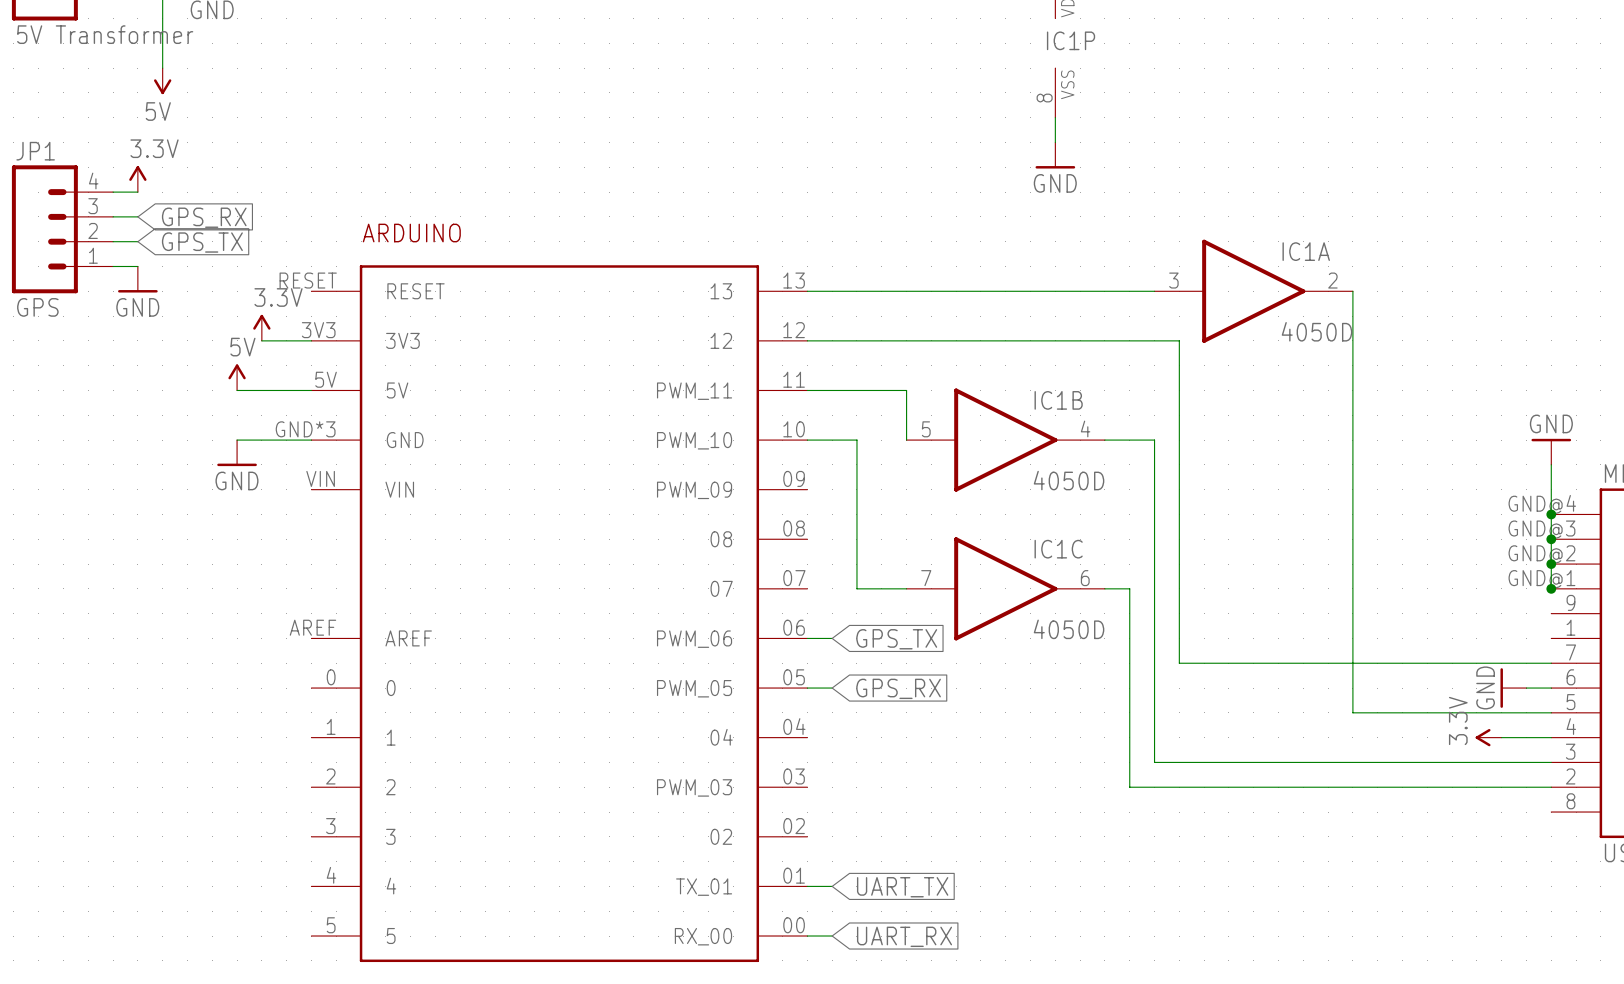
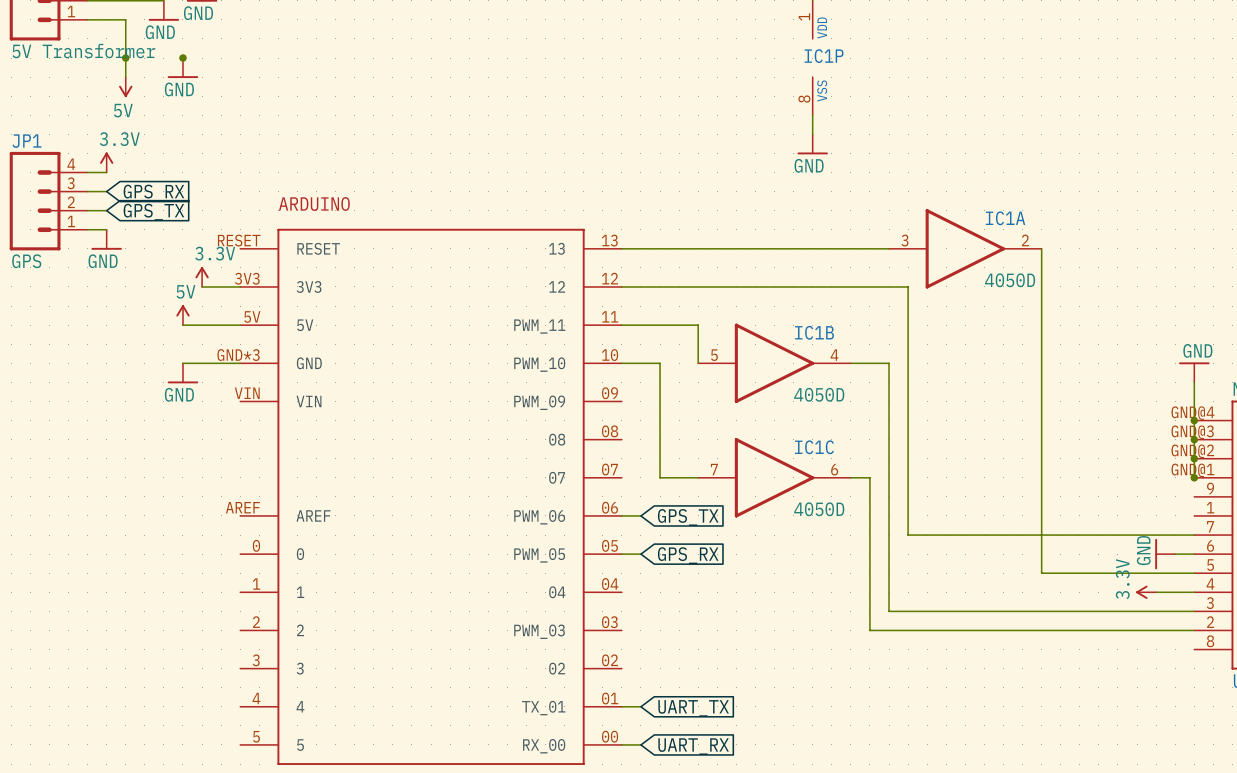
junction: none -> (125, 58)
junction: none -> (182, 58)
power symbol: none -> GND (182, 68)

